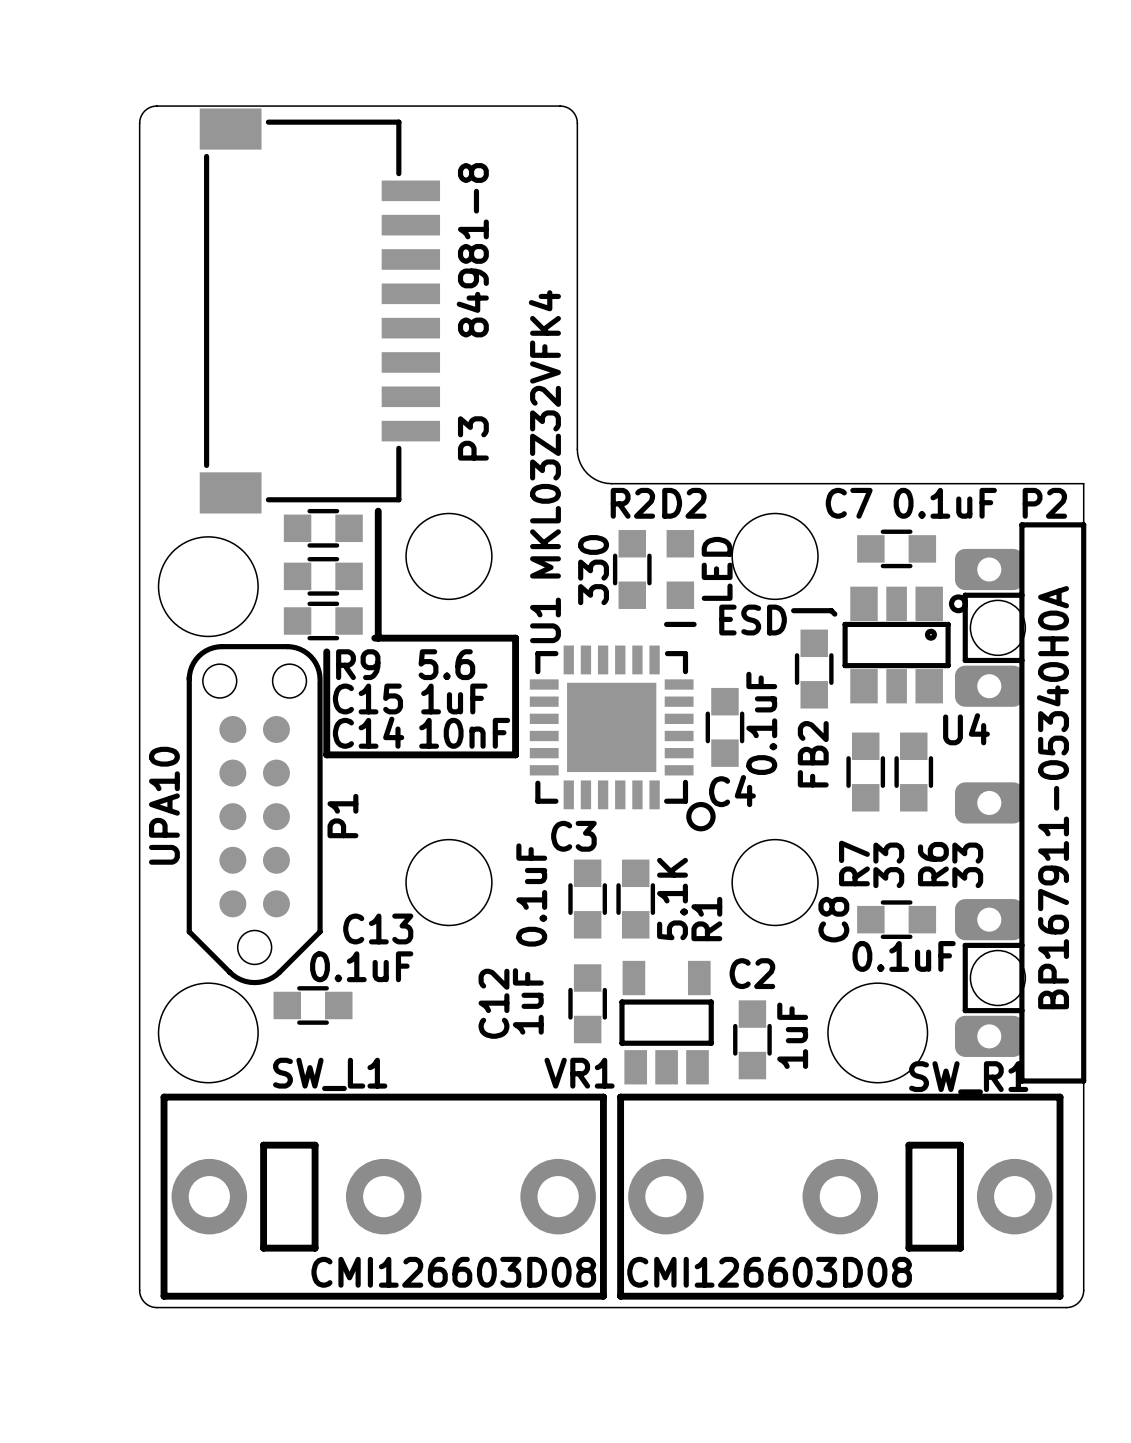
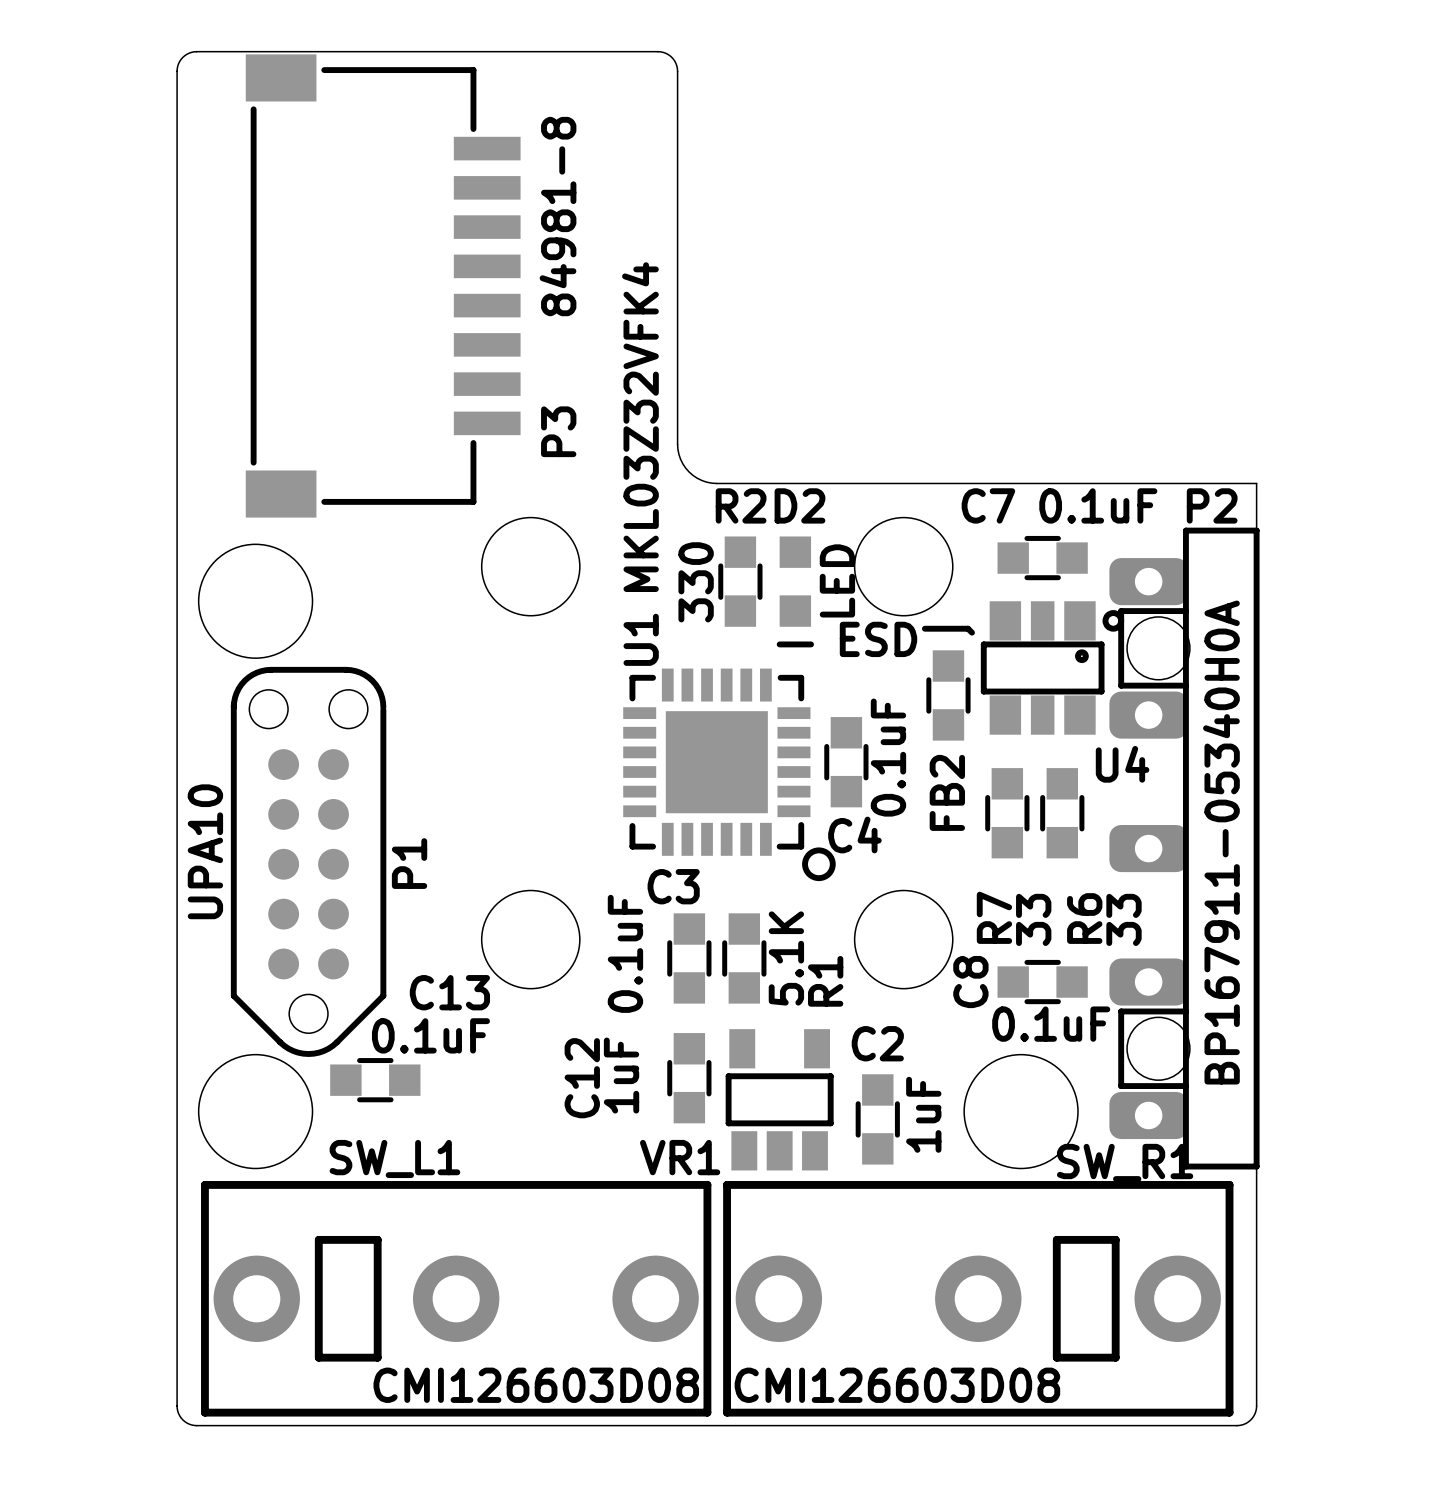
line: (378, 511) (378, 638) -> none
R9: 5.6 (323, 528) -> none
C15: 1uF (323, 576) -> none
C14: 10nF (323, 620) -> none
line: (374, 638) (515, 638) (515, 754) (326, 754) (326, 651) -> none

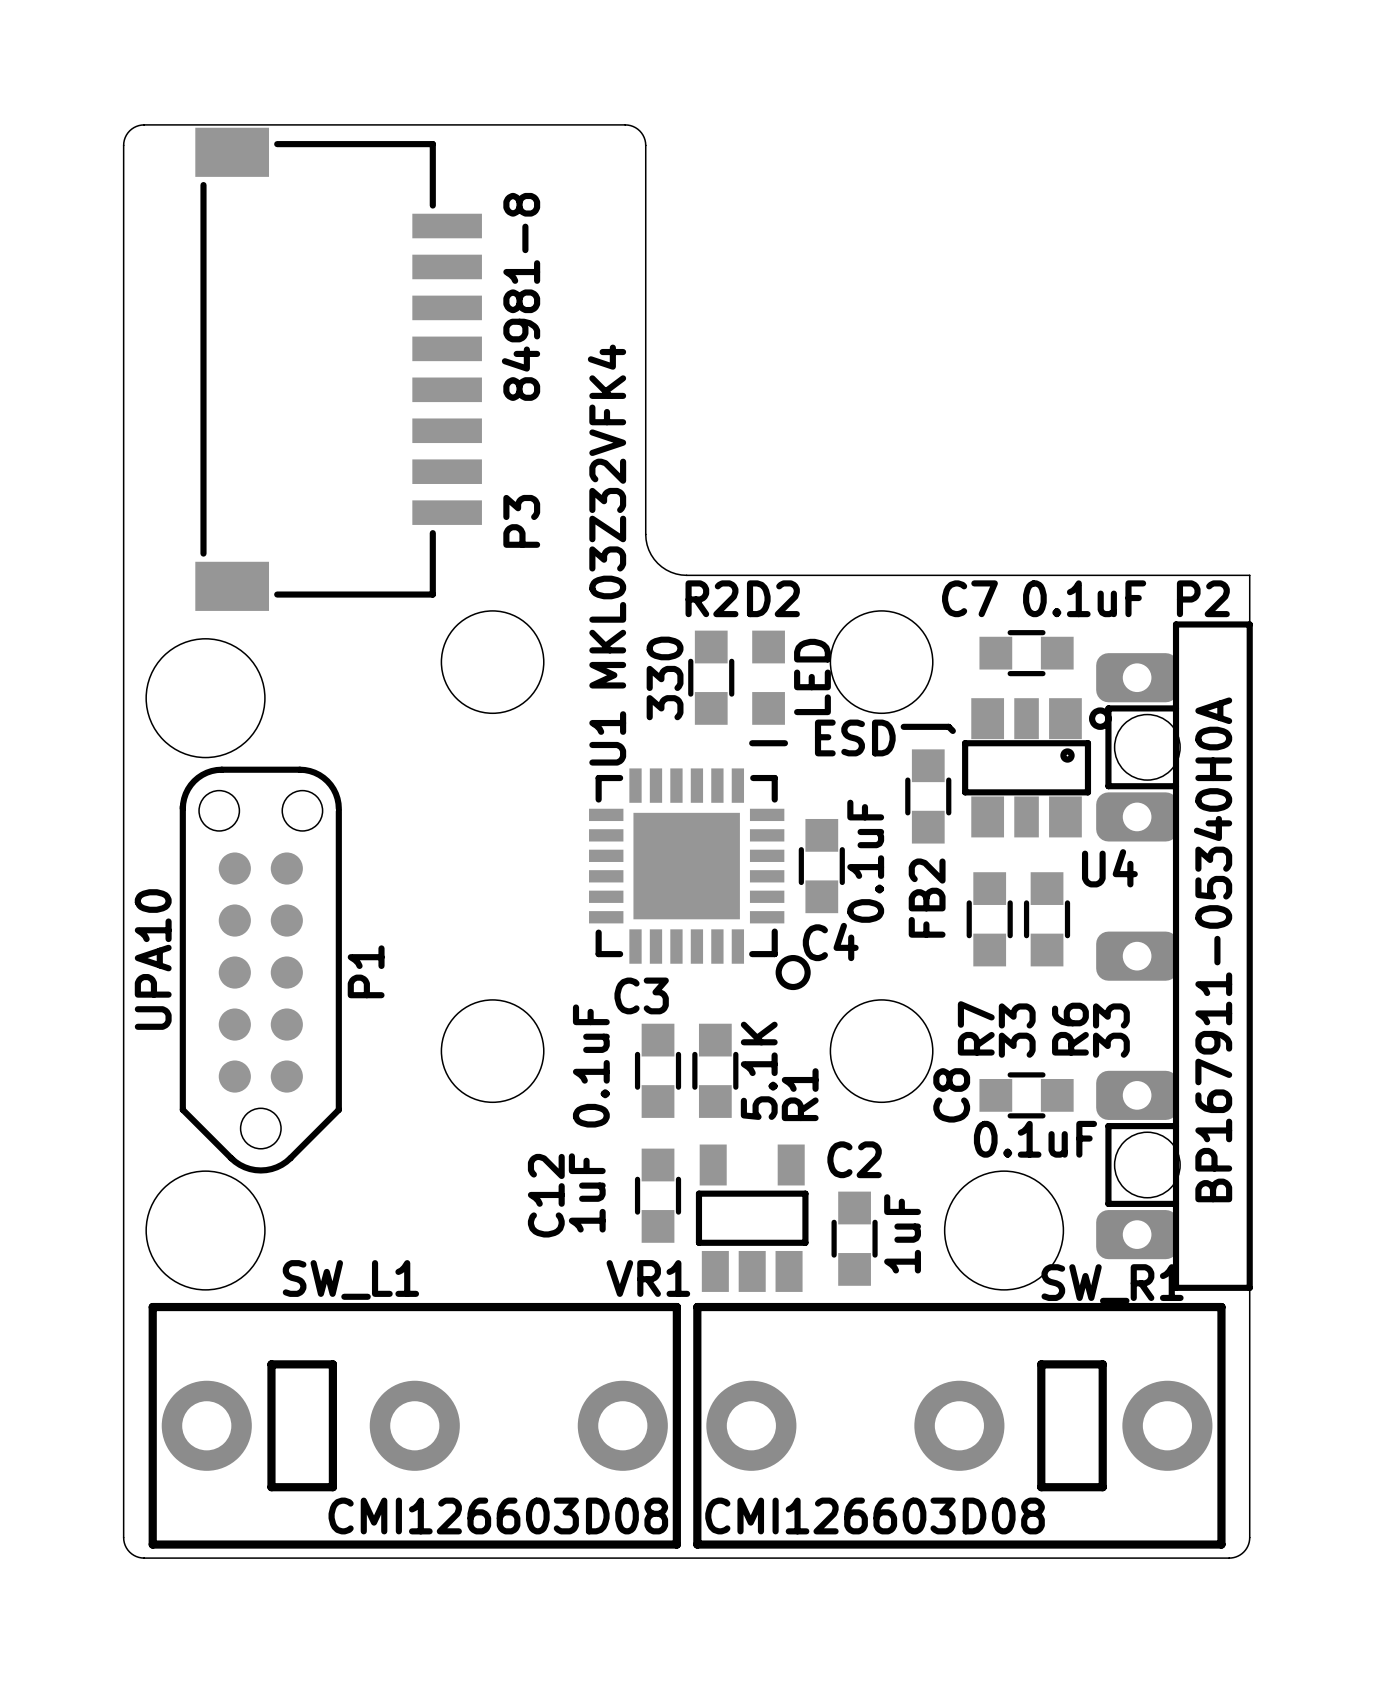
C13: 0.1uF (375, 1080) -> none

